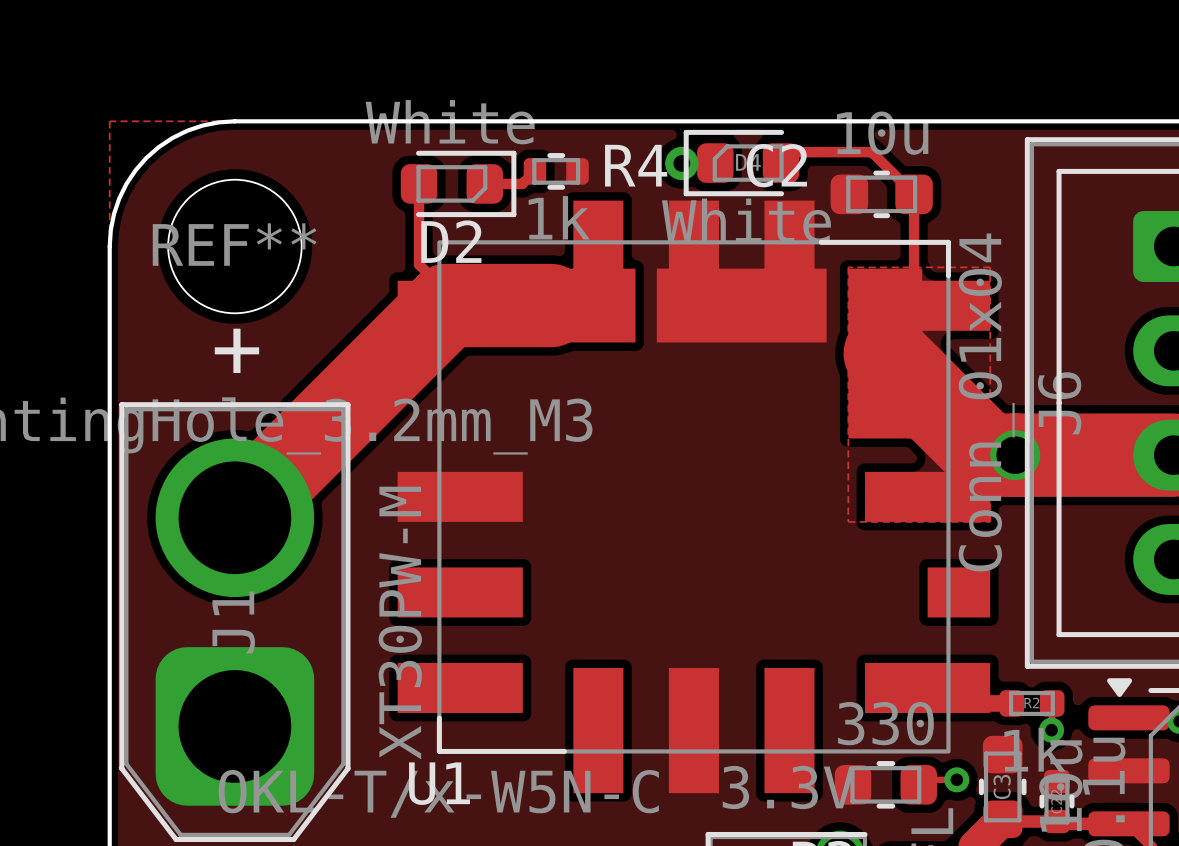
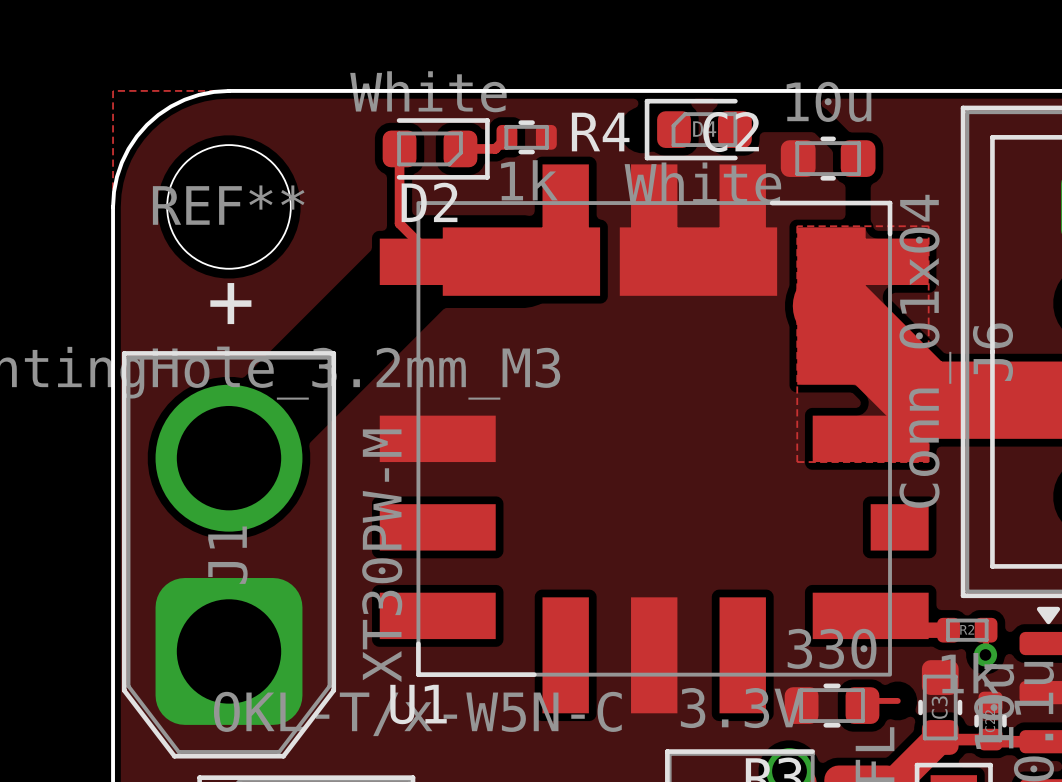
via: (681, 163) -> none
track: (781, 163) (791, 152) (871, 152) (914, 194) (914, 292) (927, 305) -> none
track: (550, 305) (447, 305) (234, 517) -> none
via: (1015, 455) -> none
via: (956, 779) -> none

